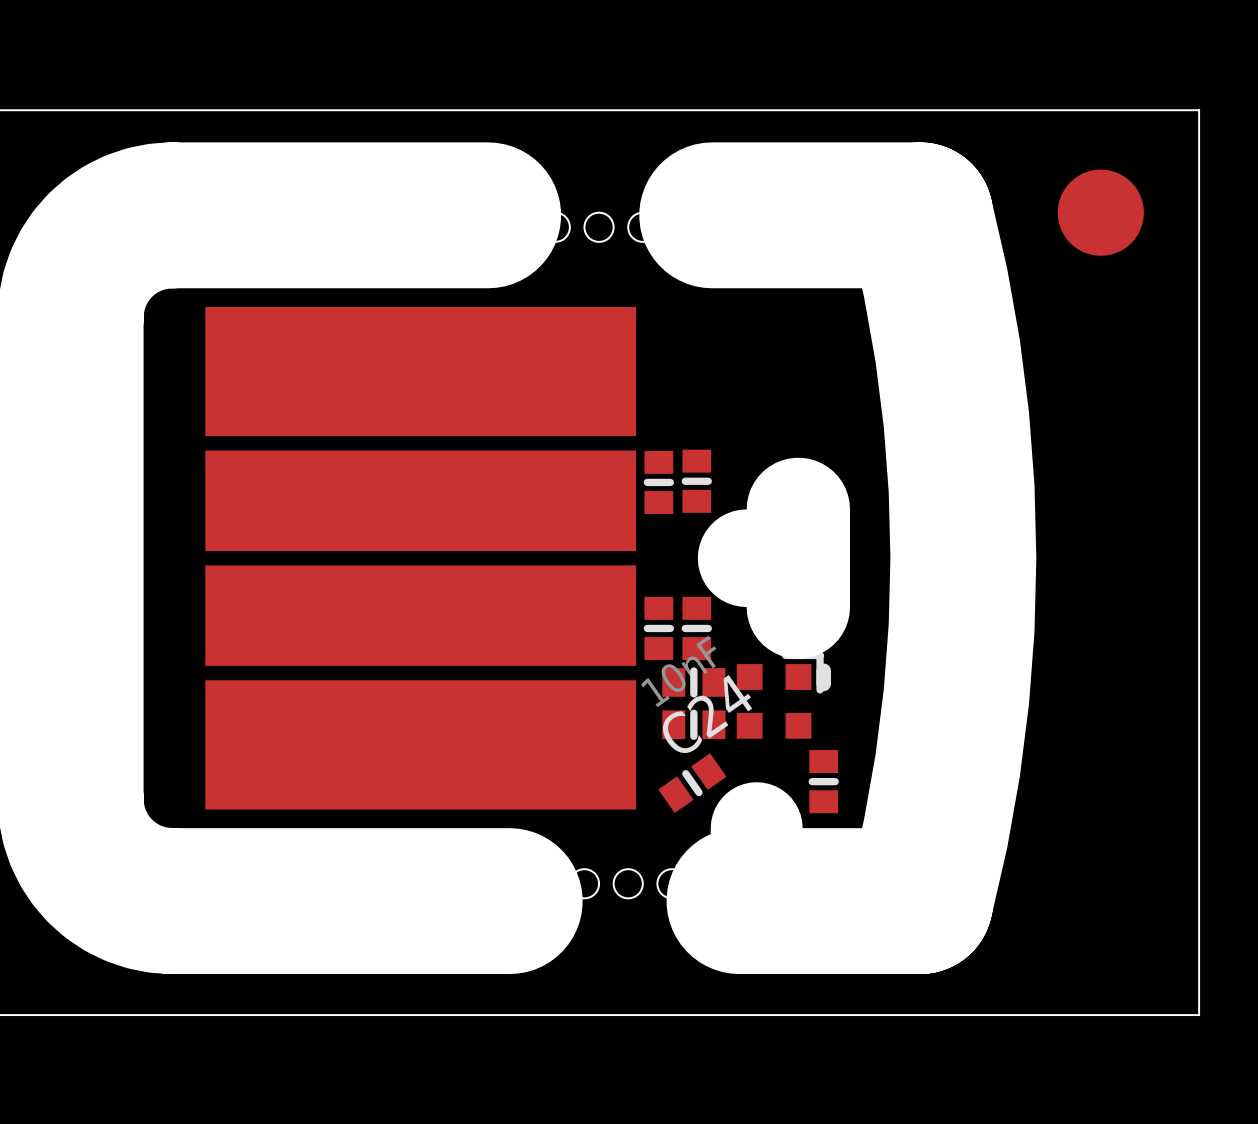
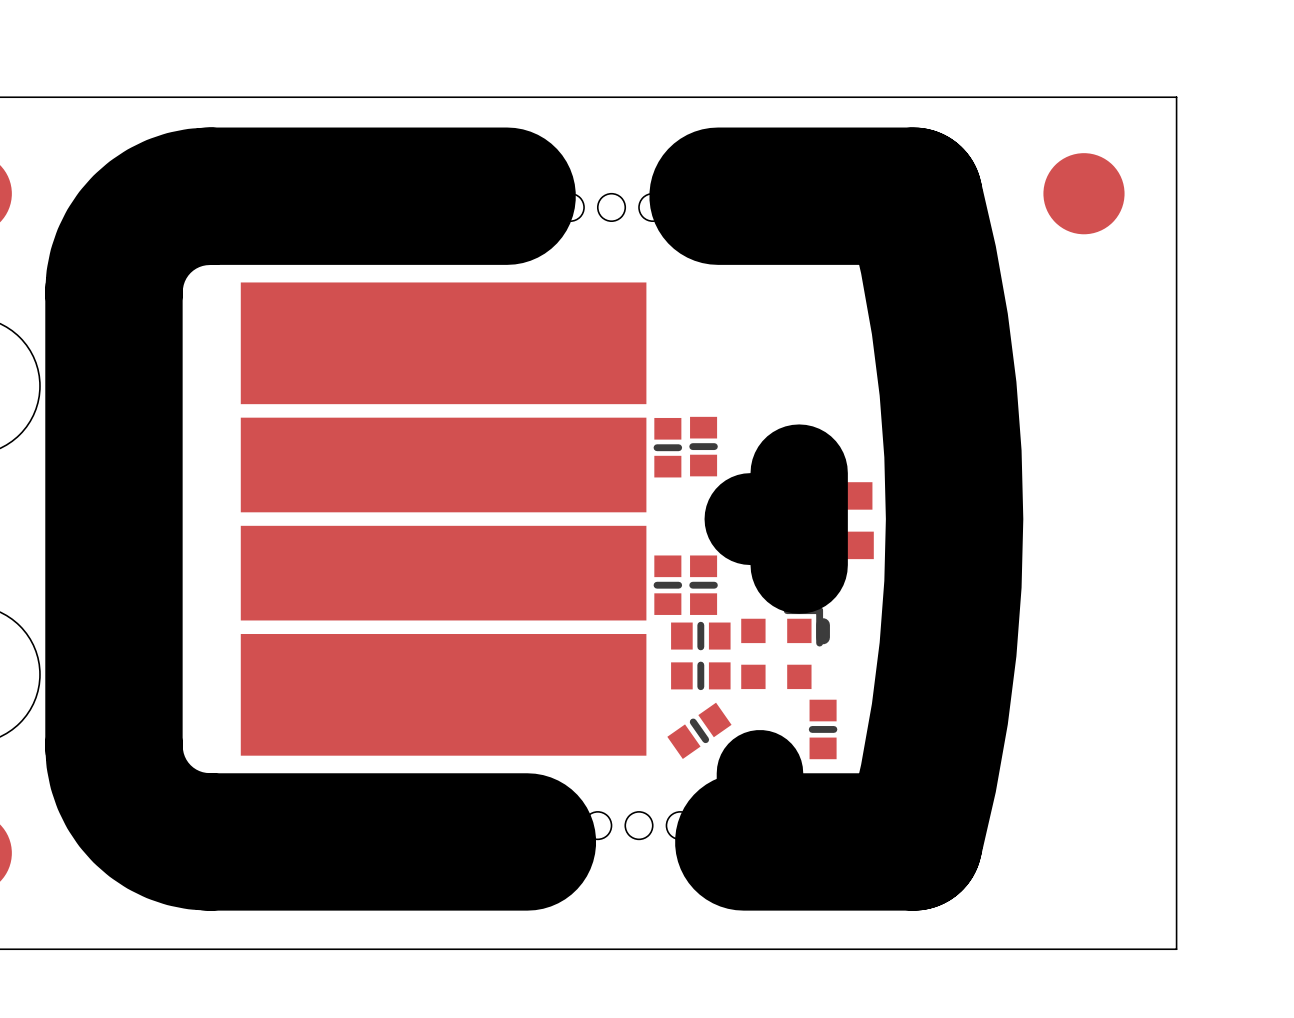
part: none -> (859, 520)
C24 value: 10nF (678, 671) -> none
C24 name: C24 (707, 714) -> none

